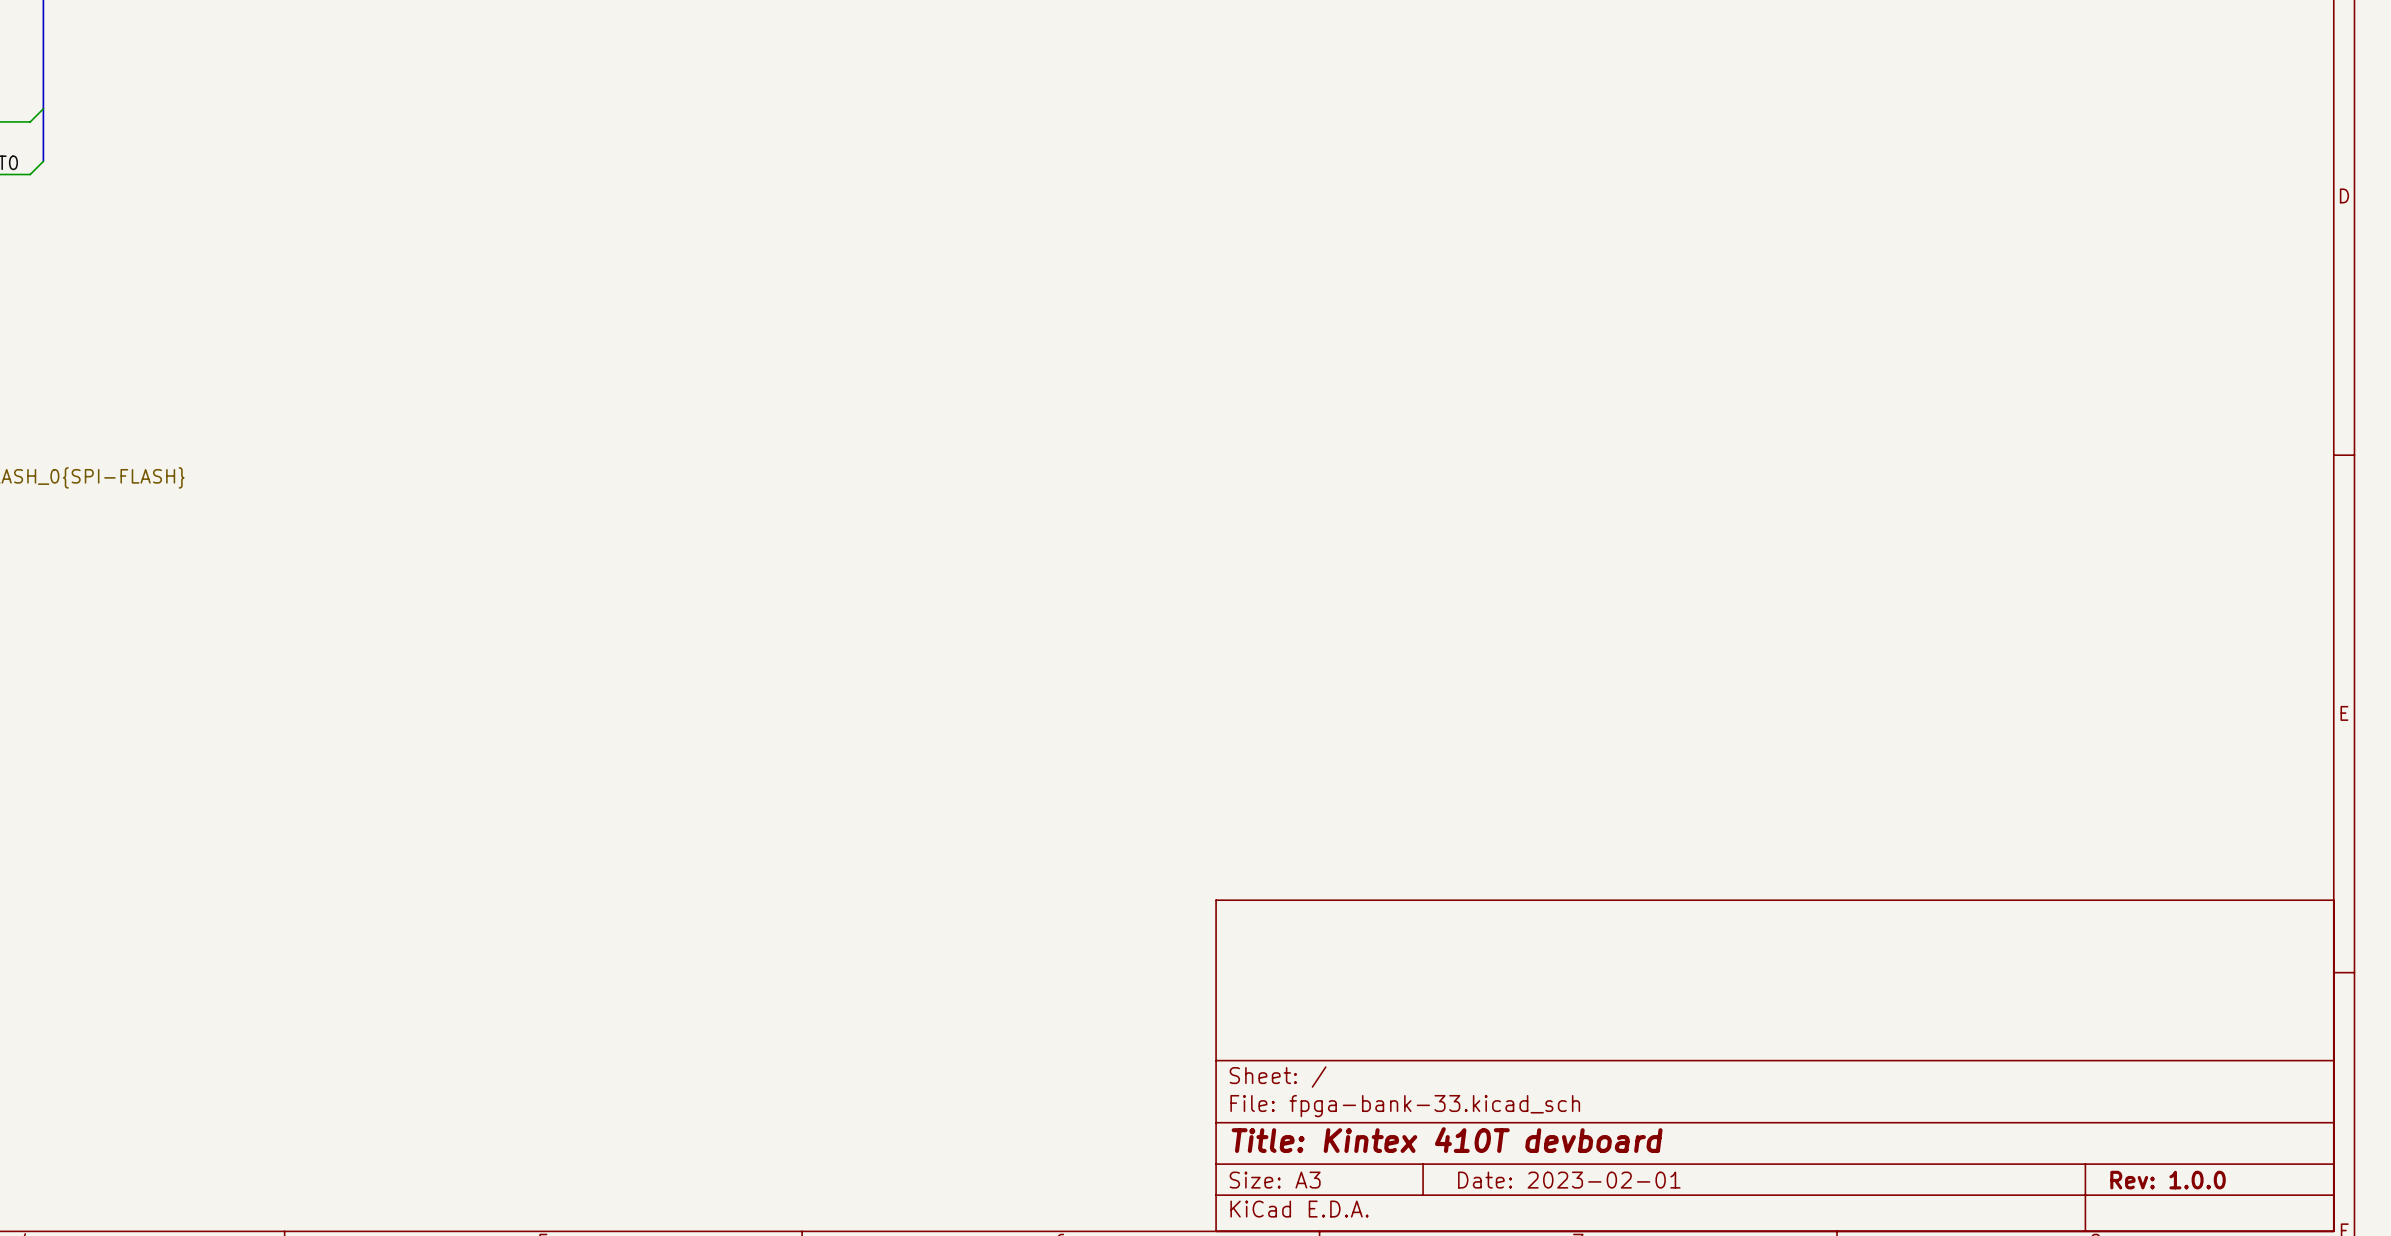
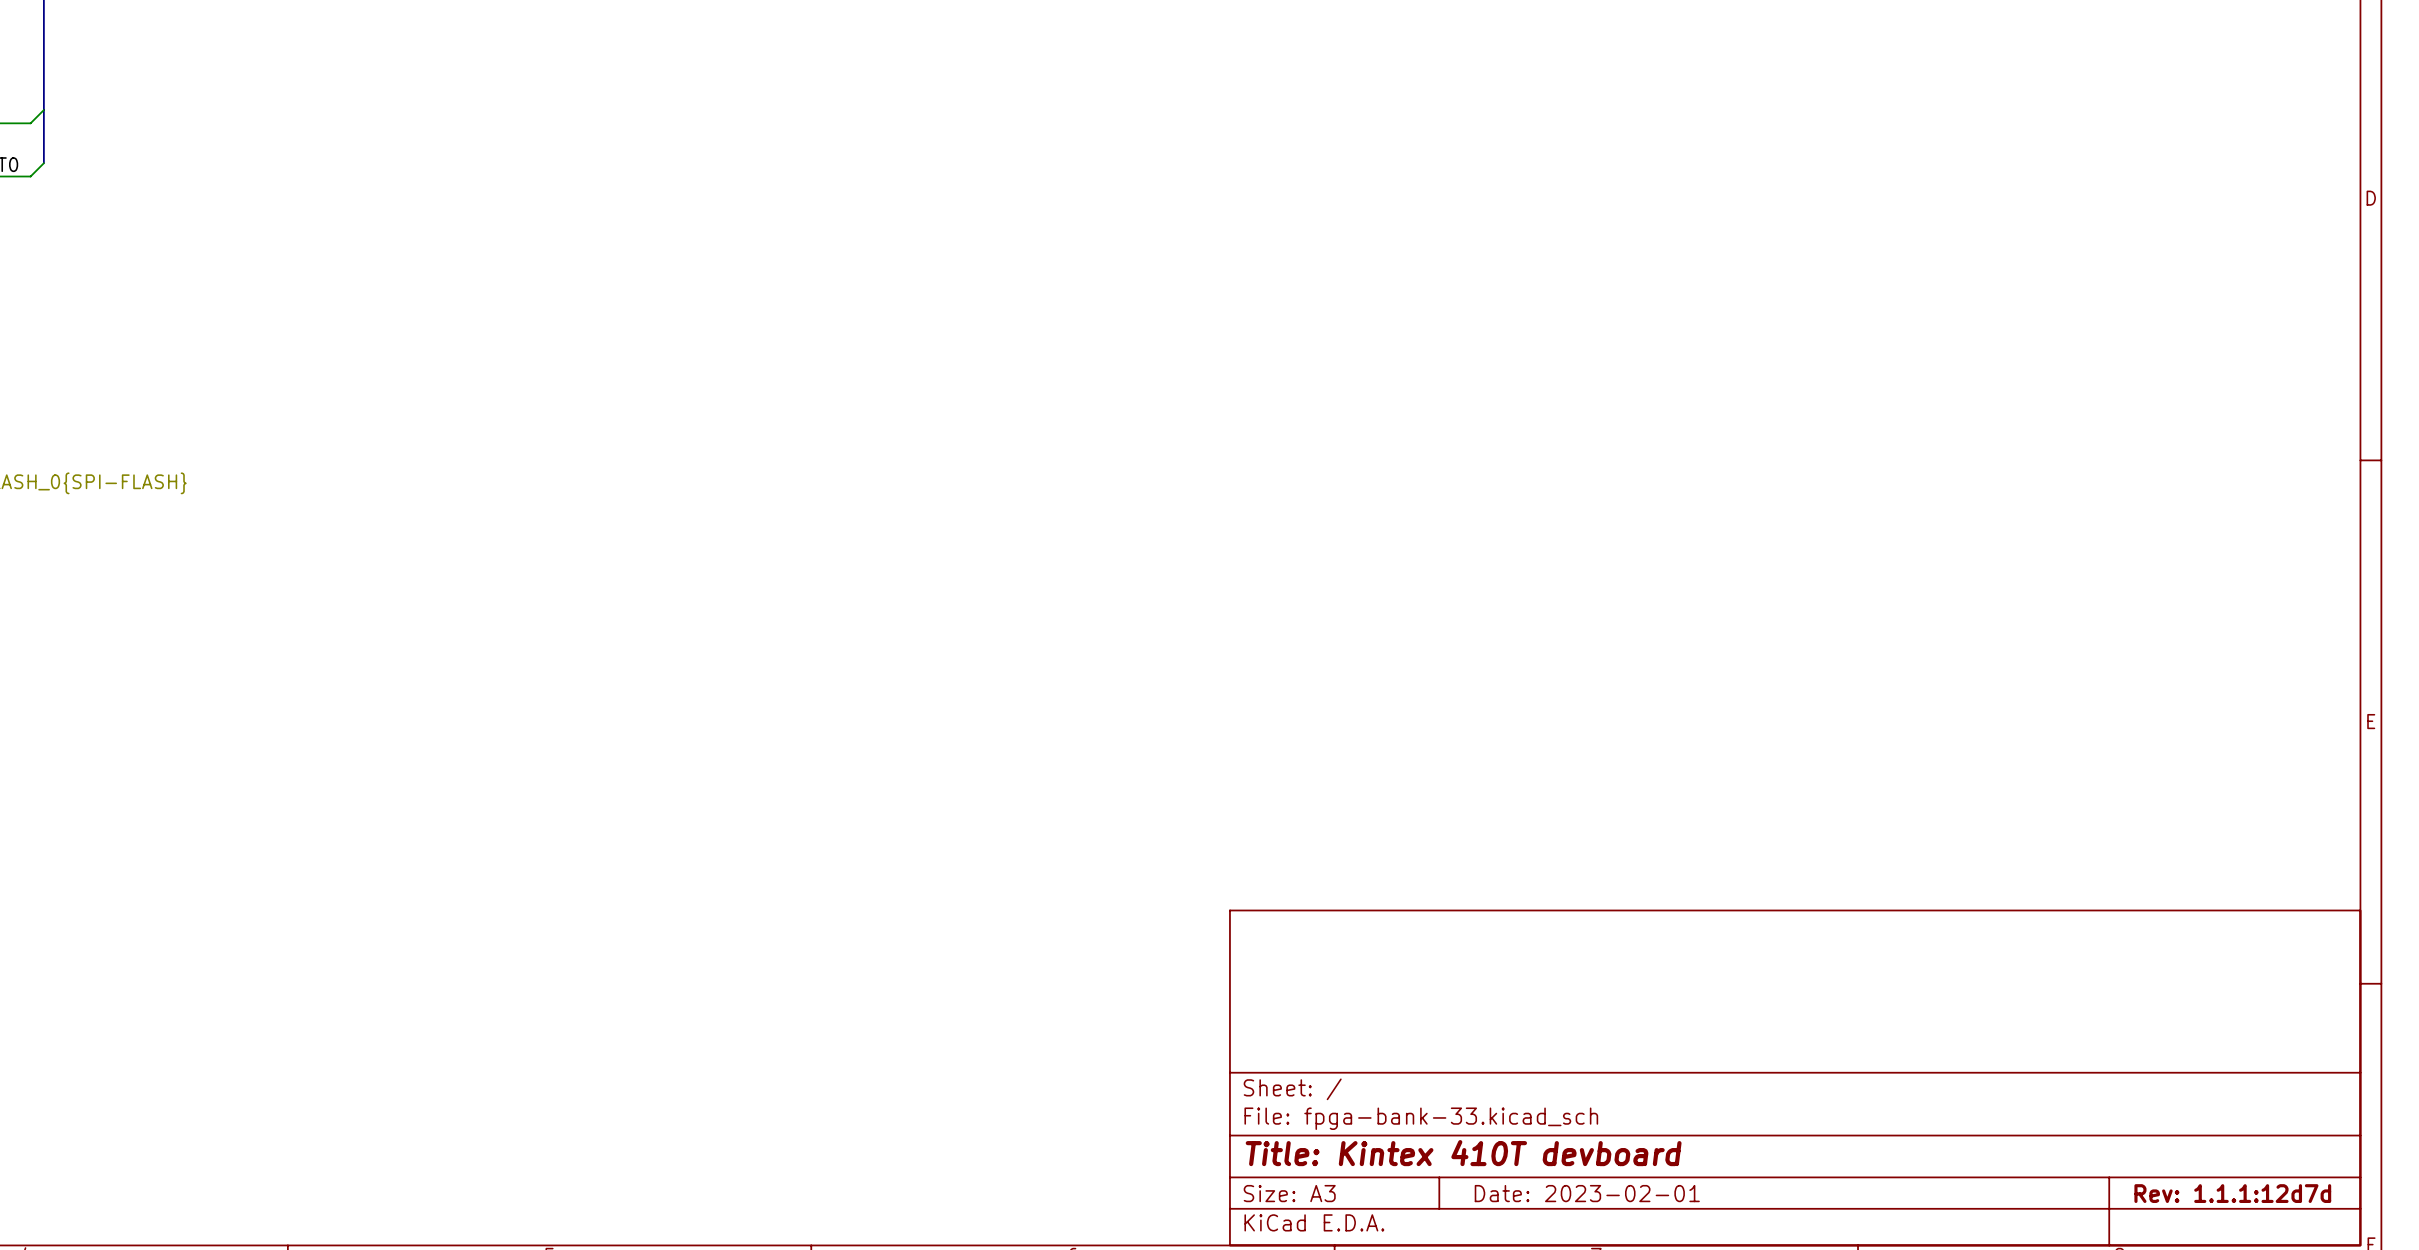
title block: Rev: 1.0.0 (2168, 1180) -> Rev: 1.1.1:12d7d (2232, 1193)

